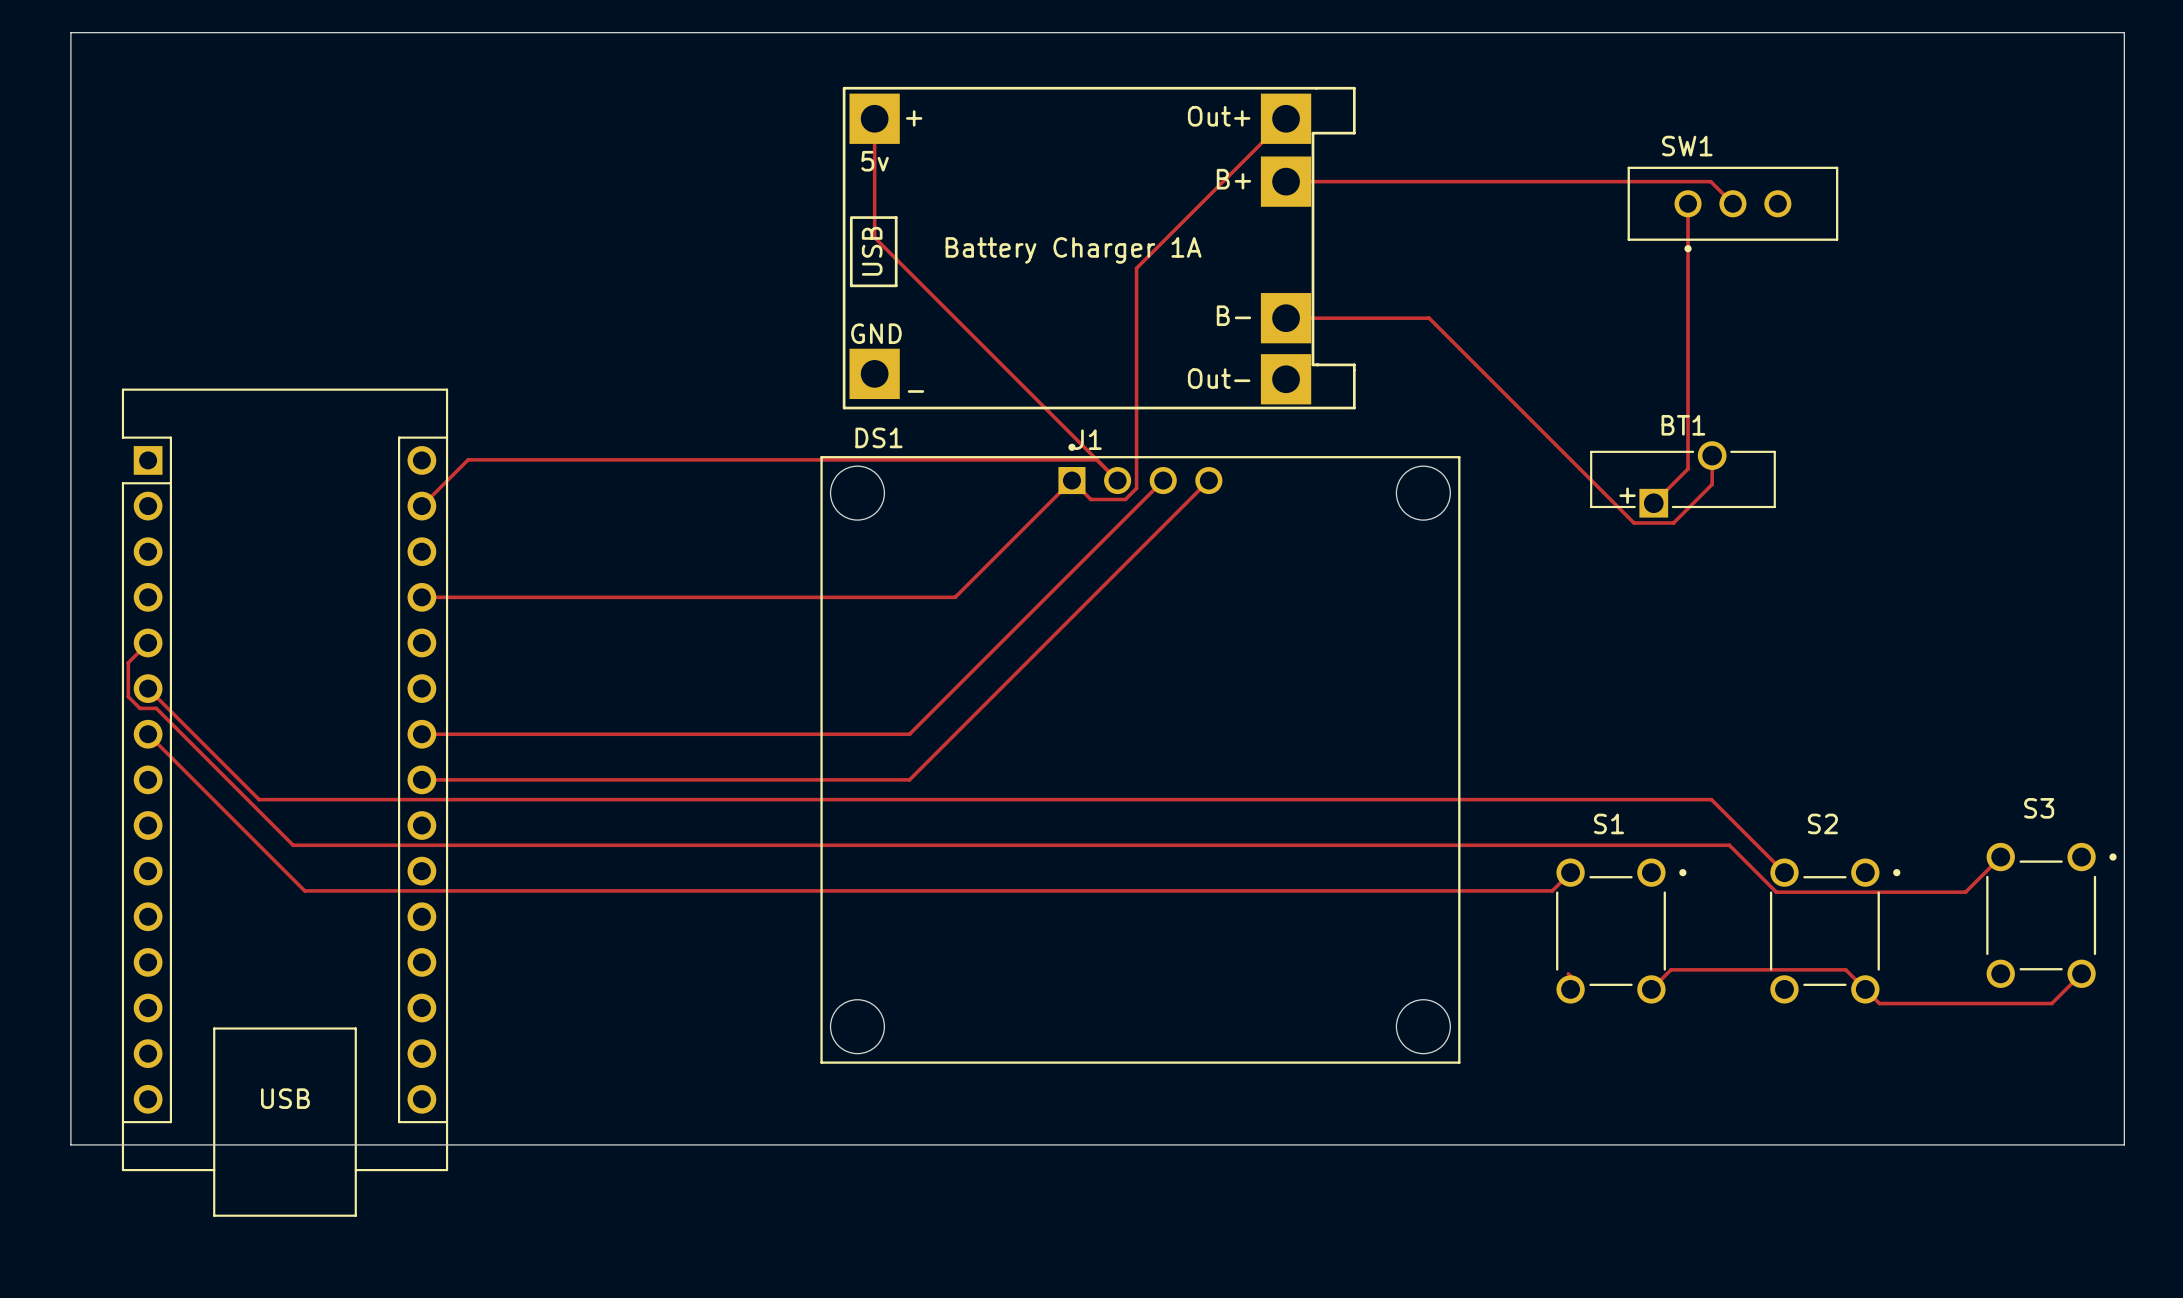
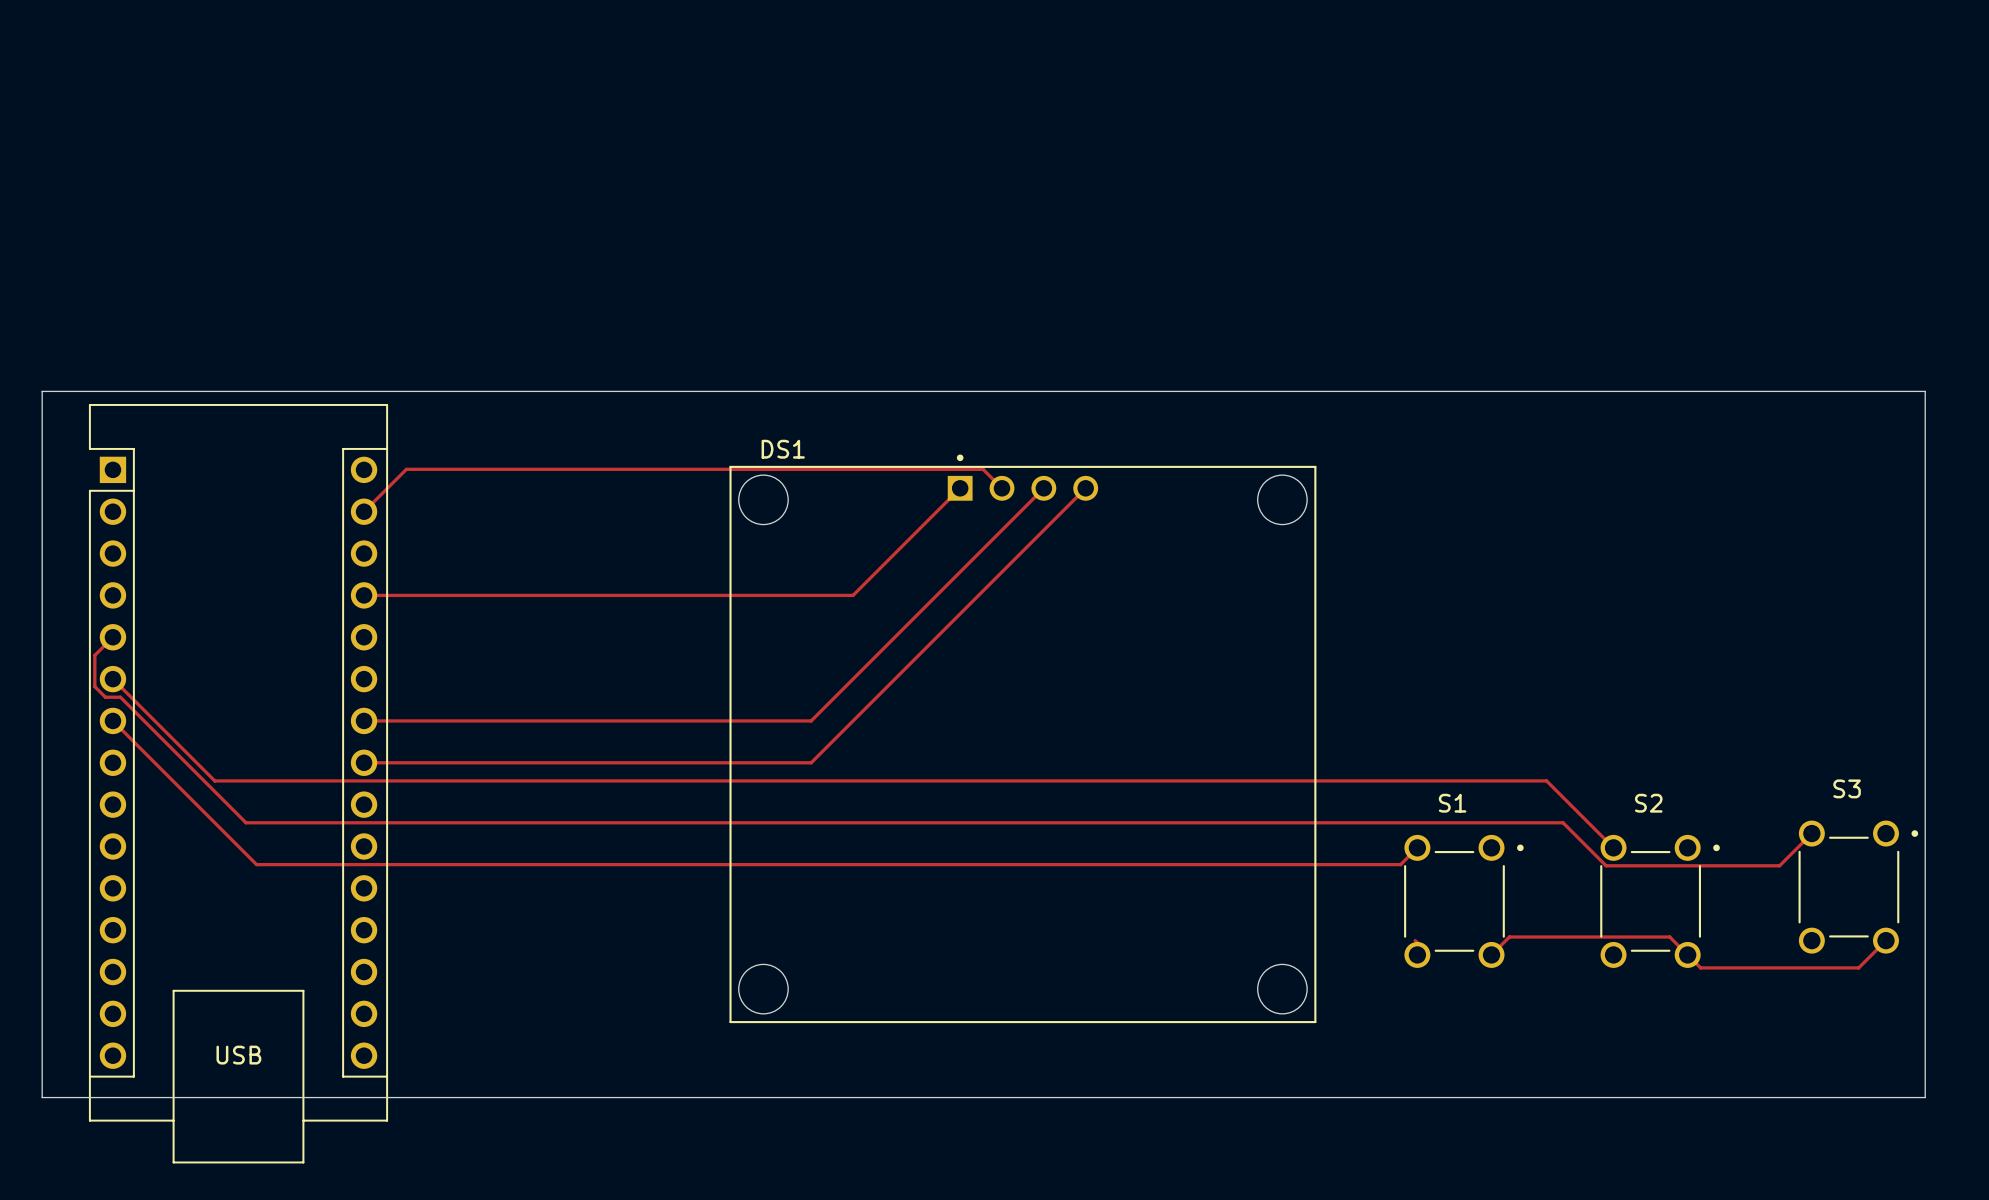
track: (874, 118) (874, 237) (1096, 459) -> none
track: (1286, 118) (1136, 268) (1136, 488) (1125, 499) (1090, 499) (1071, 480) -> none
track: (1286, 181) (1710, 181) (1732, 203) -> none
track: (1688, 203) (1688, 468) (1653, 503) -> none
SW1: (1732, 209) -> none
J1: (1099, 248) -> none
track: (1286, 318) (1429, 318) (1634, 523) (1673, 523) (1712, 484) (1712, 455) -> none
board edge: (70, 374) (70, 32) (2124, 32) (2124, 374) -> (42, 391) (1925, 391)
BT1: (1682, 479) -> none

